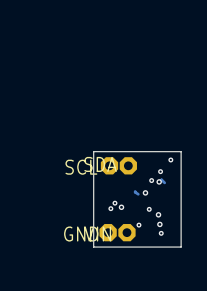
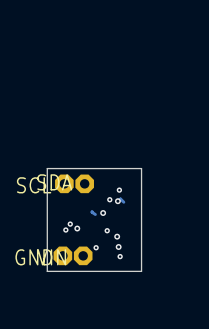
via: (170, 159) -> none

